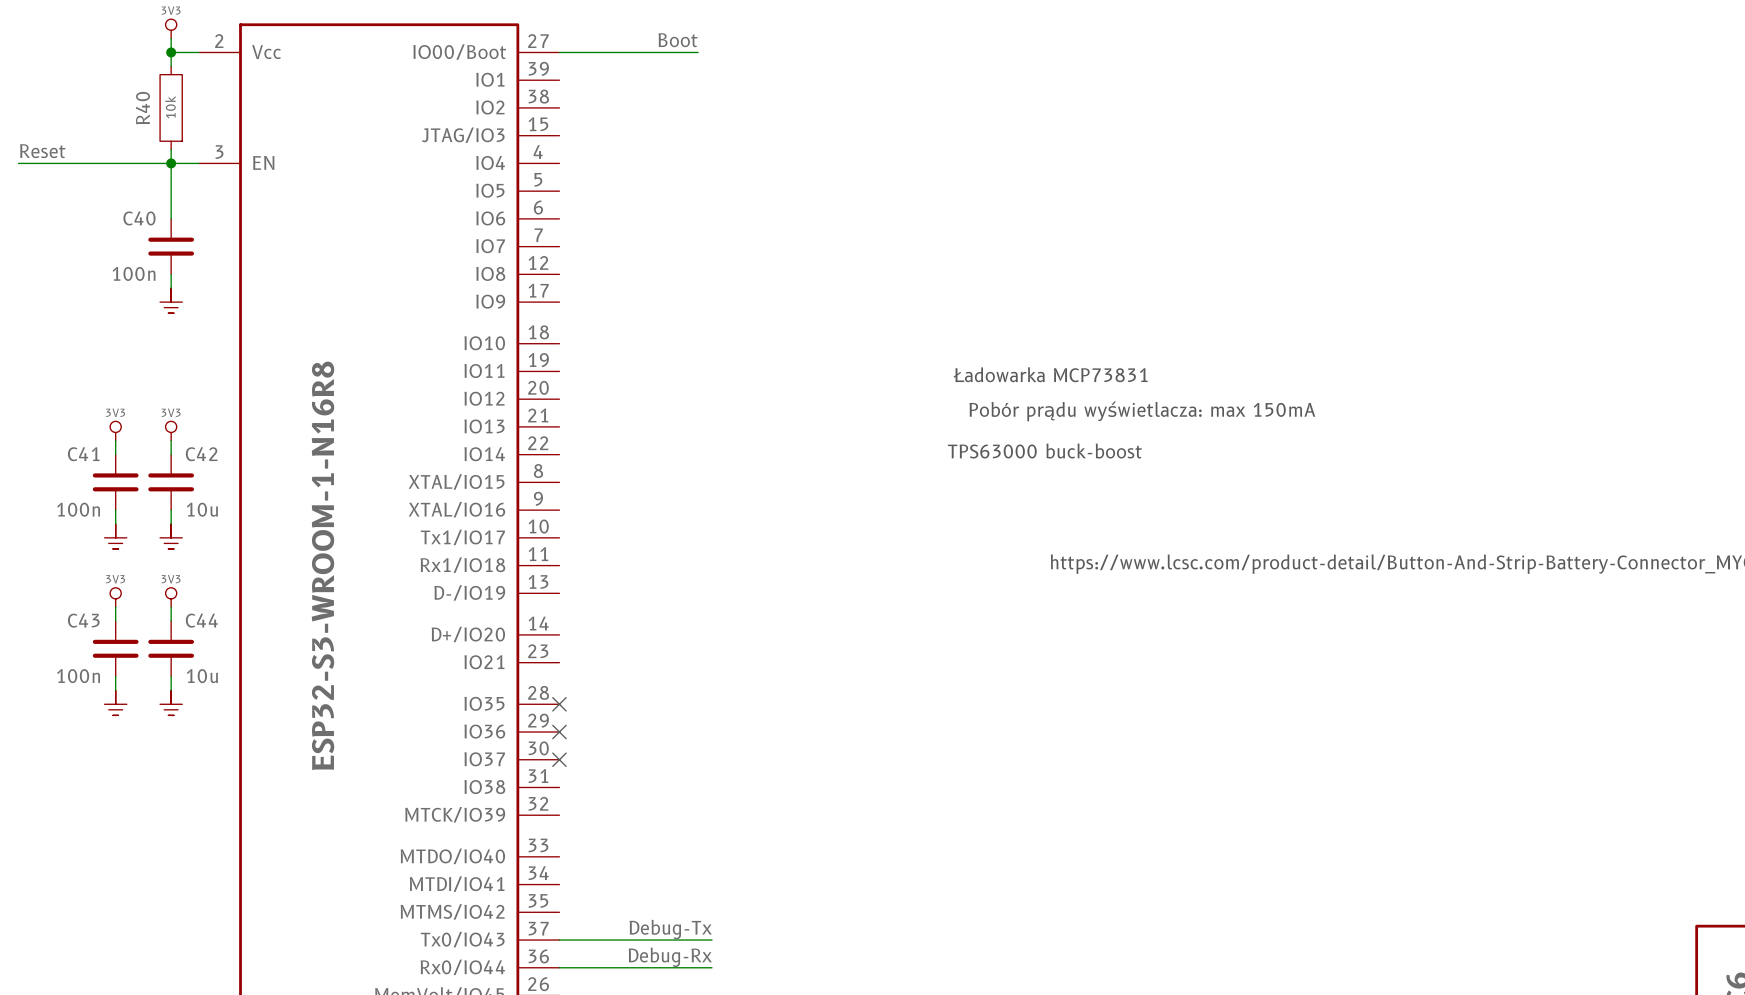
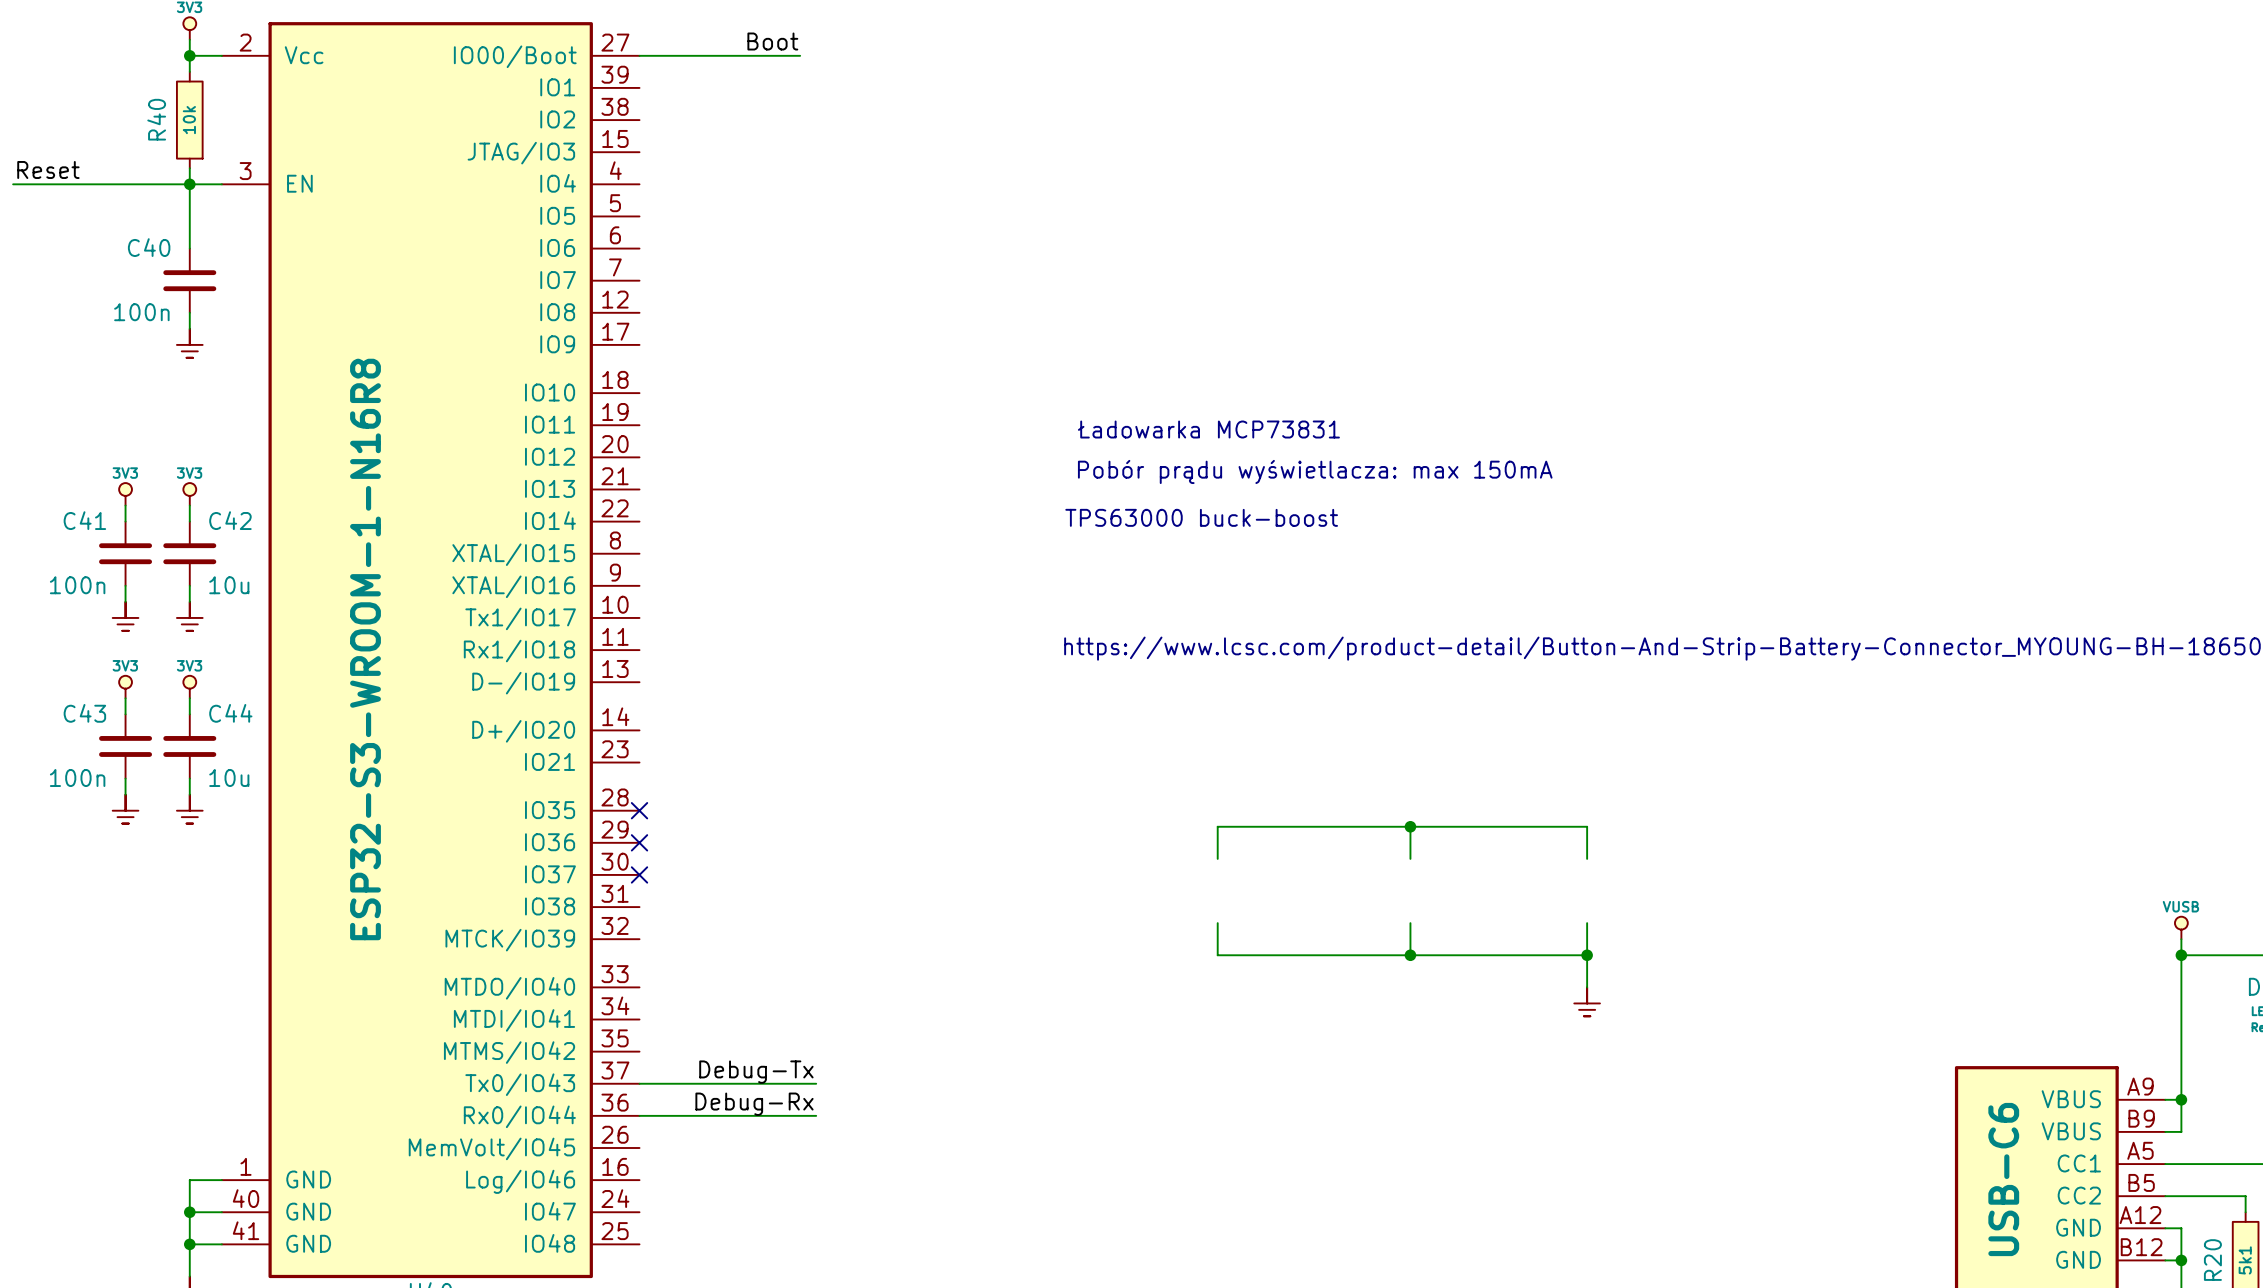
wire: none -> (1410, 826) (1410, 858)
junction: none -> (1410, 826)
wire: none -> (1217, 858) (1217, 826) (1587, 826) (1587, 858)
wire: none -> (1217, 923) (1217, 955) (1587, 955)
wire: none -> (1410, 923) (1410, 955)
wire: none -> (1587, 923) (1587, 987)
junction: none -> (1410, 955)
junction: none -> (1587, 955)
power symbol: none -> (1587, 1001)

